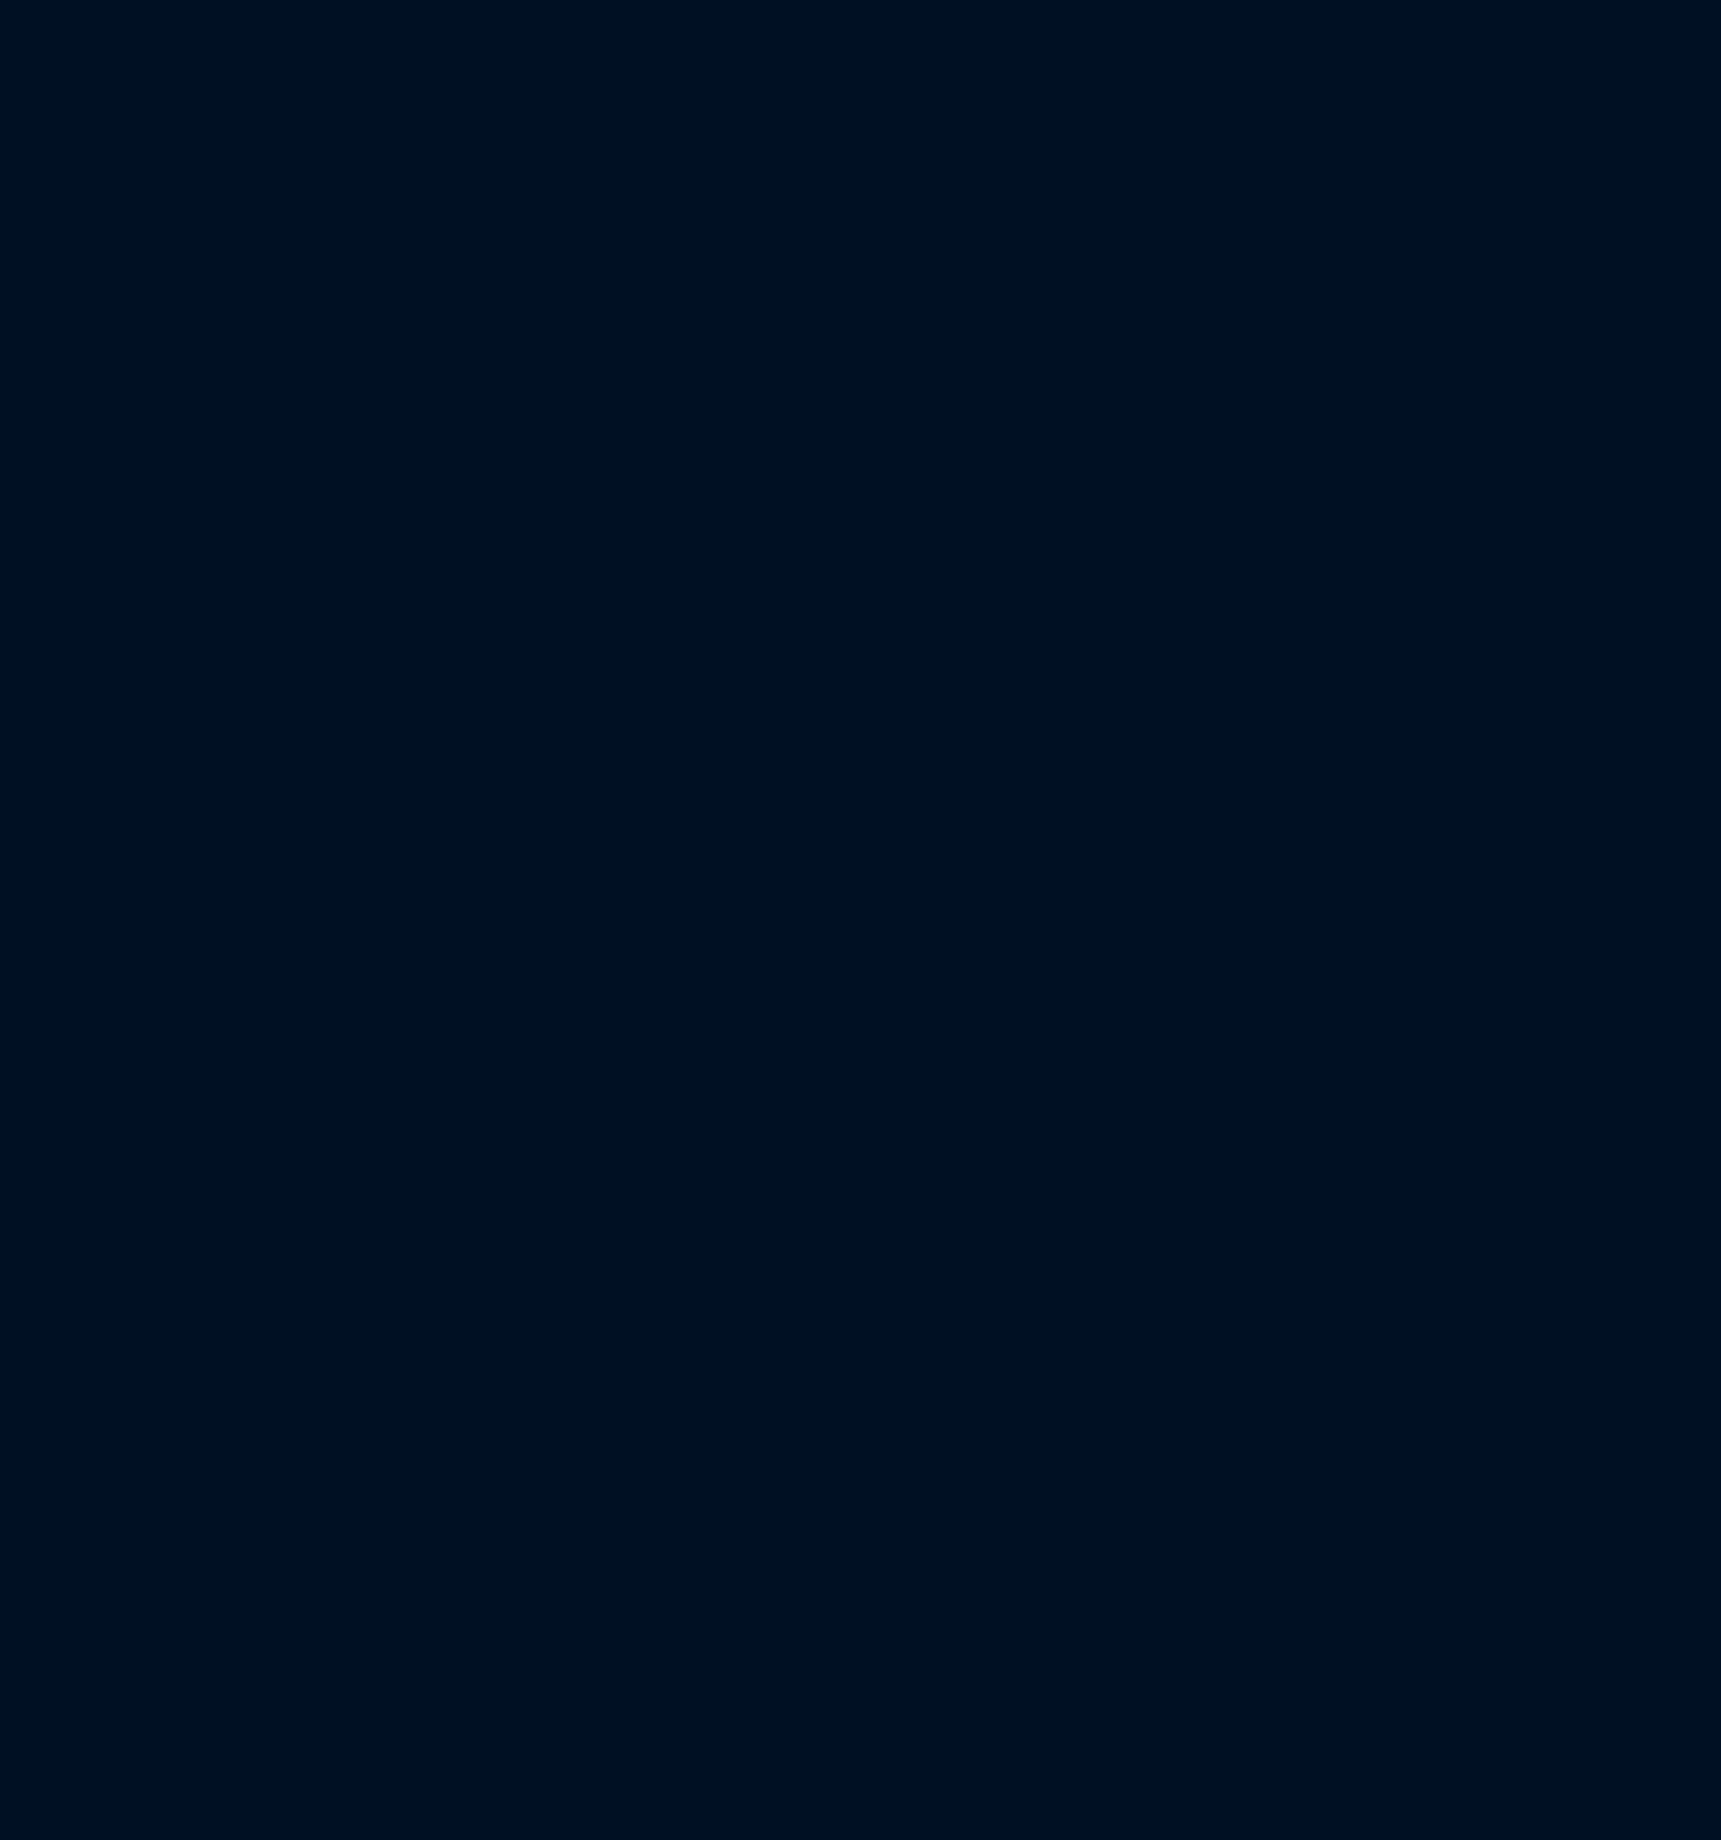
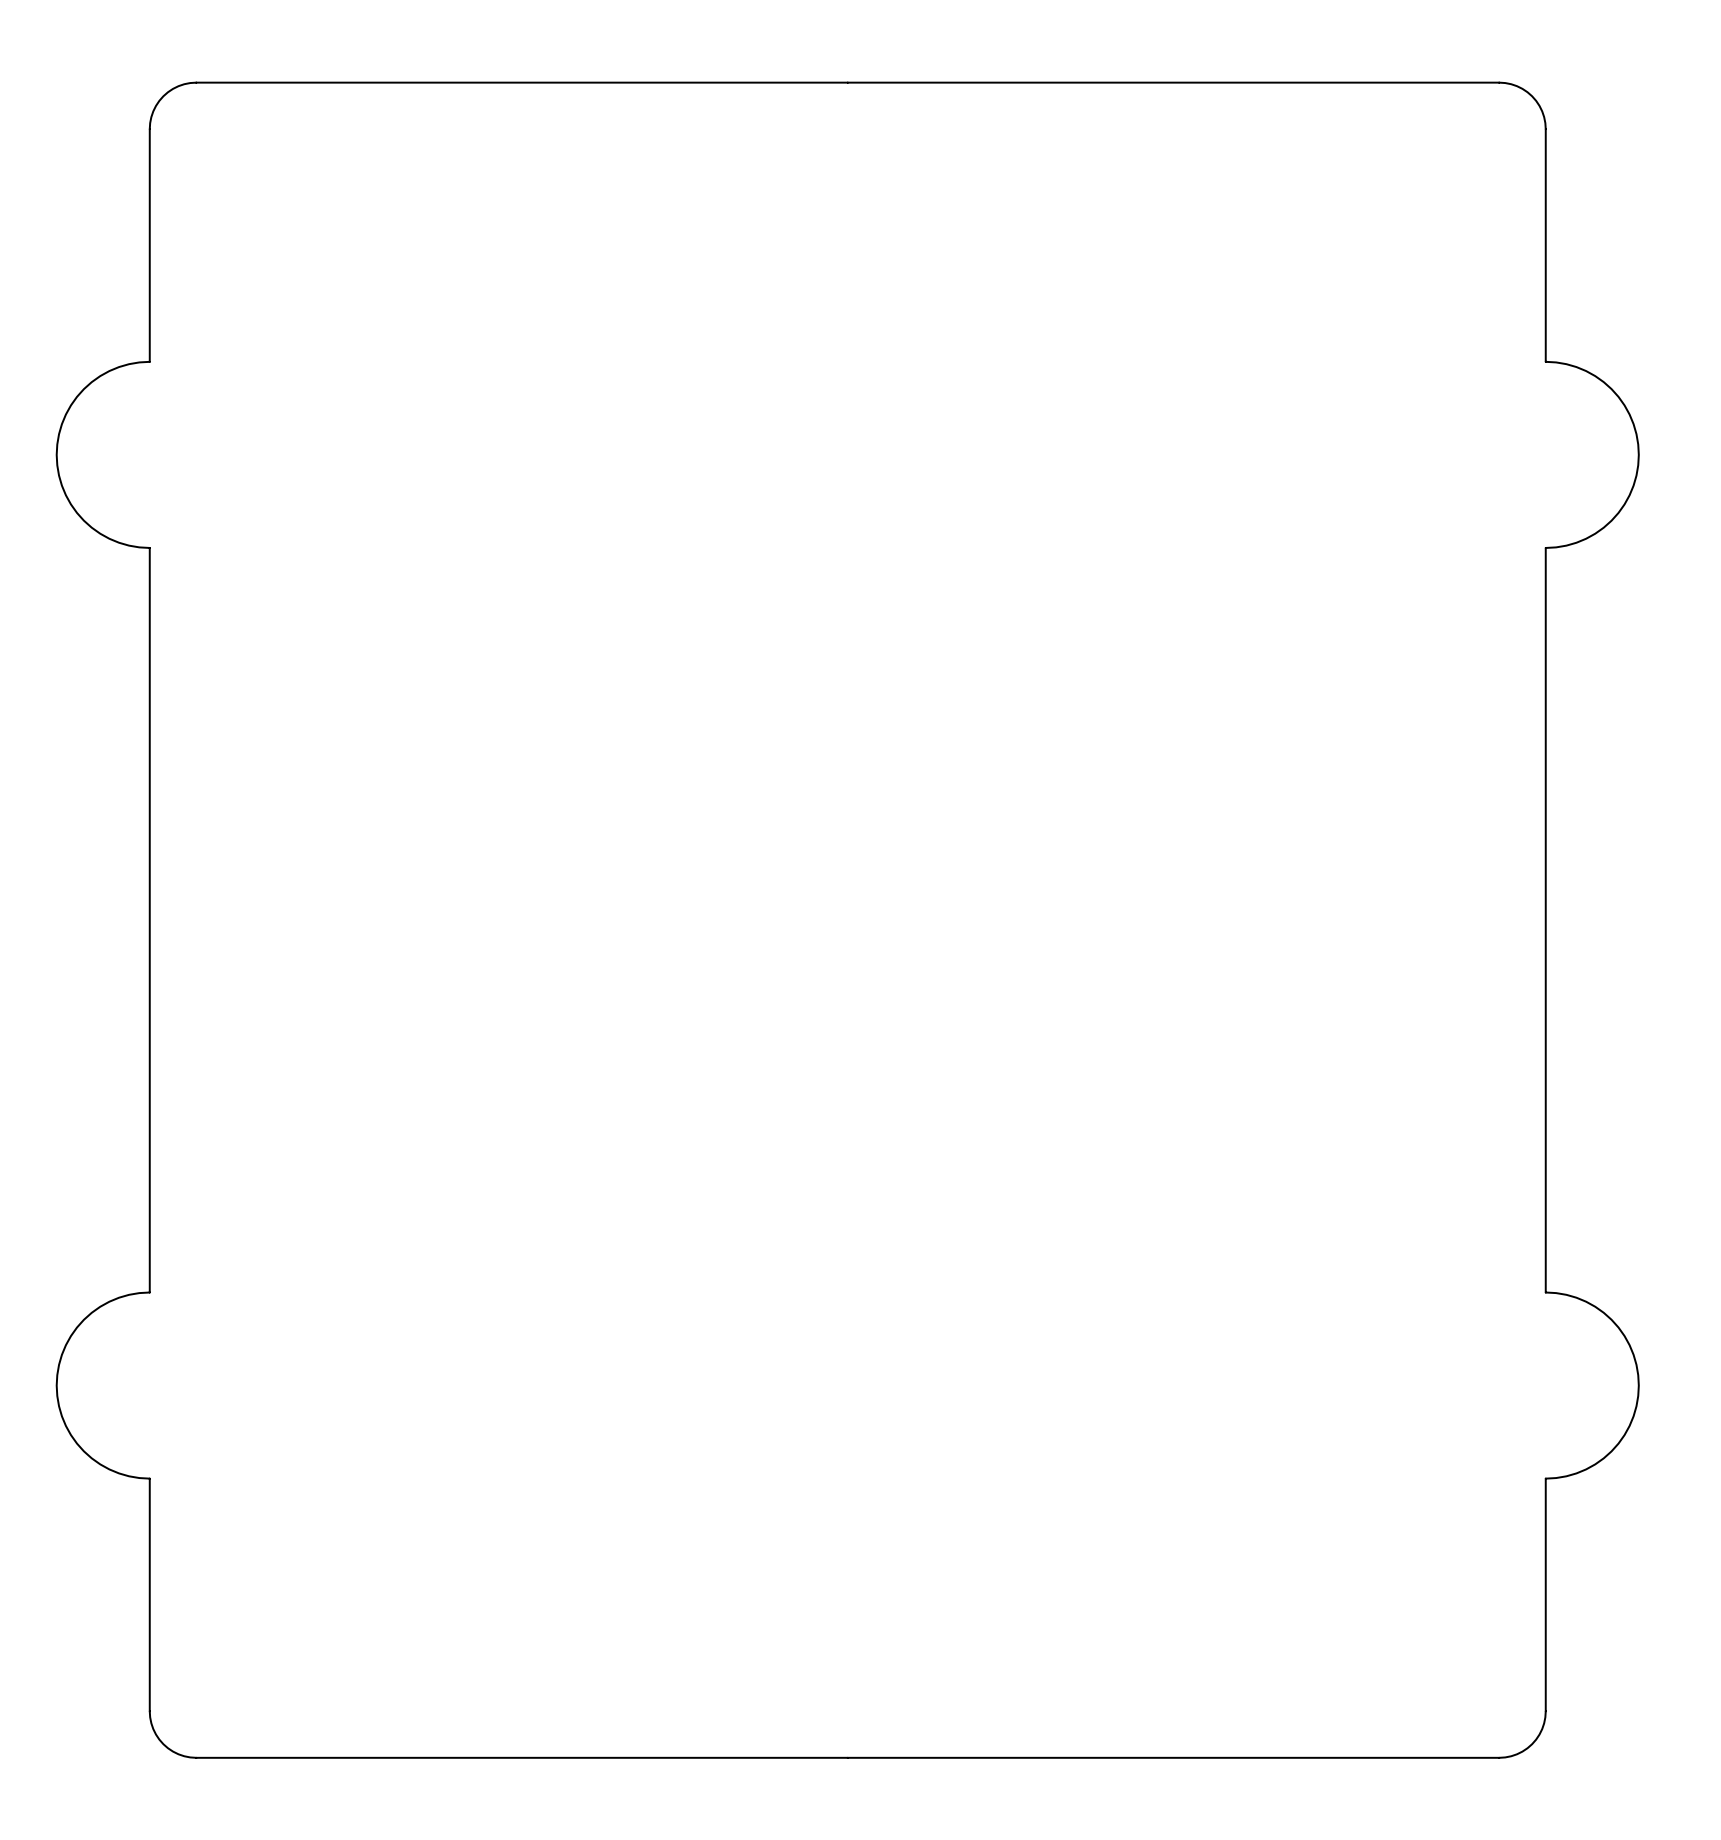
board edge: none -> (196, 82) (1499, 82) (1511, 84) (1522, 88) (1536, 100) (1542, 111) (1545, 129) (1545, 361) (1566, 364) (1586, 371) (1611, 389) (1624, 405) (1633, 424) (1638, 454) (1633, 485) (1624, 504) (1611, 520) (1586, 538) (1566, 545) (1545, 547) (1545, 1292) (1576, 1297) (1595, 1306) (1611, 1319) (1624, 1336) (1633, 1354) (1638, 1385) (1636, 1406) (1629, 1425) (1611, 1451) (1595, 1464) (1576, 1473) (1545, 1478) (1545, 1717) (1539, 1734) (1527, 1748) (1511, 1756) (1499, 1757) (196, 1757) (178, 1754) (167, 1748) (159, 1739) (151, 1723) (149, 1711) (149, 1478) (119, 1473) (100, 1464) (83, 1451) (70, 1435) (61, 1416) (56, 1385) (61, 1354) (70, 1336) (83, 1319) (109, 1301) (129, 1294) (149, 1292) (149, 547) (129, 545) (109, 538) (83, 520) (65, 495) (59, 475) (56, 454) (59, 434) (65, 414) (83, 389) (100, 376) (119, 367) (149, 361) (150, 123) (153, 111) (163, 96) (178, 86) (196, 82)

